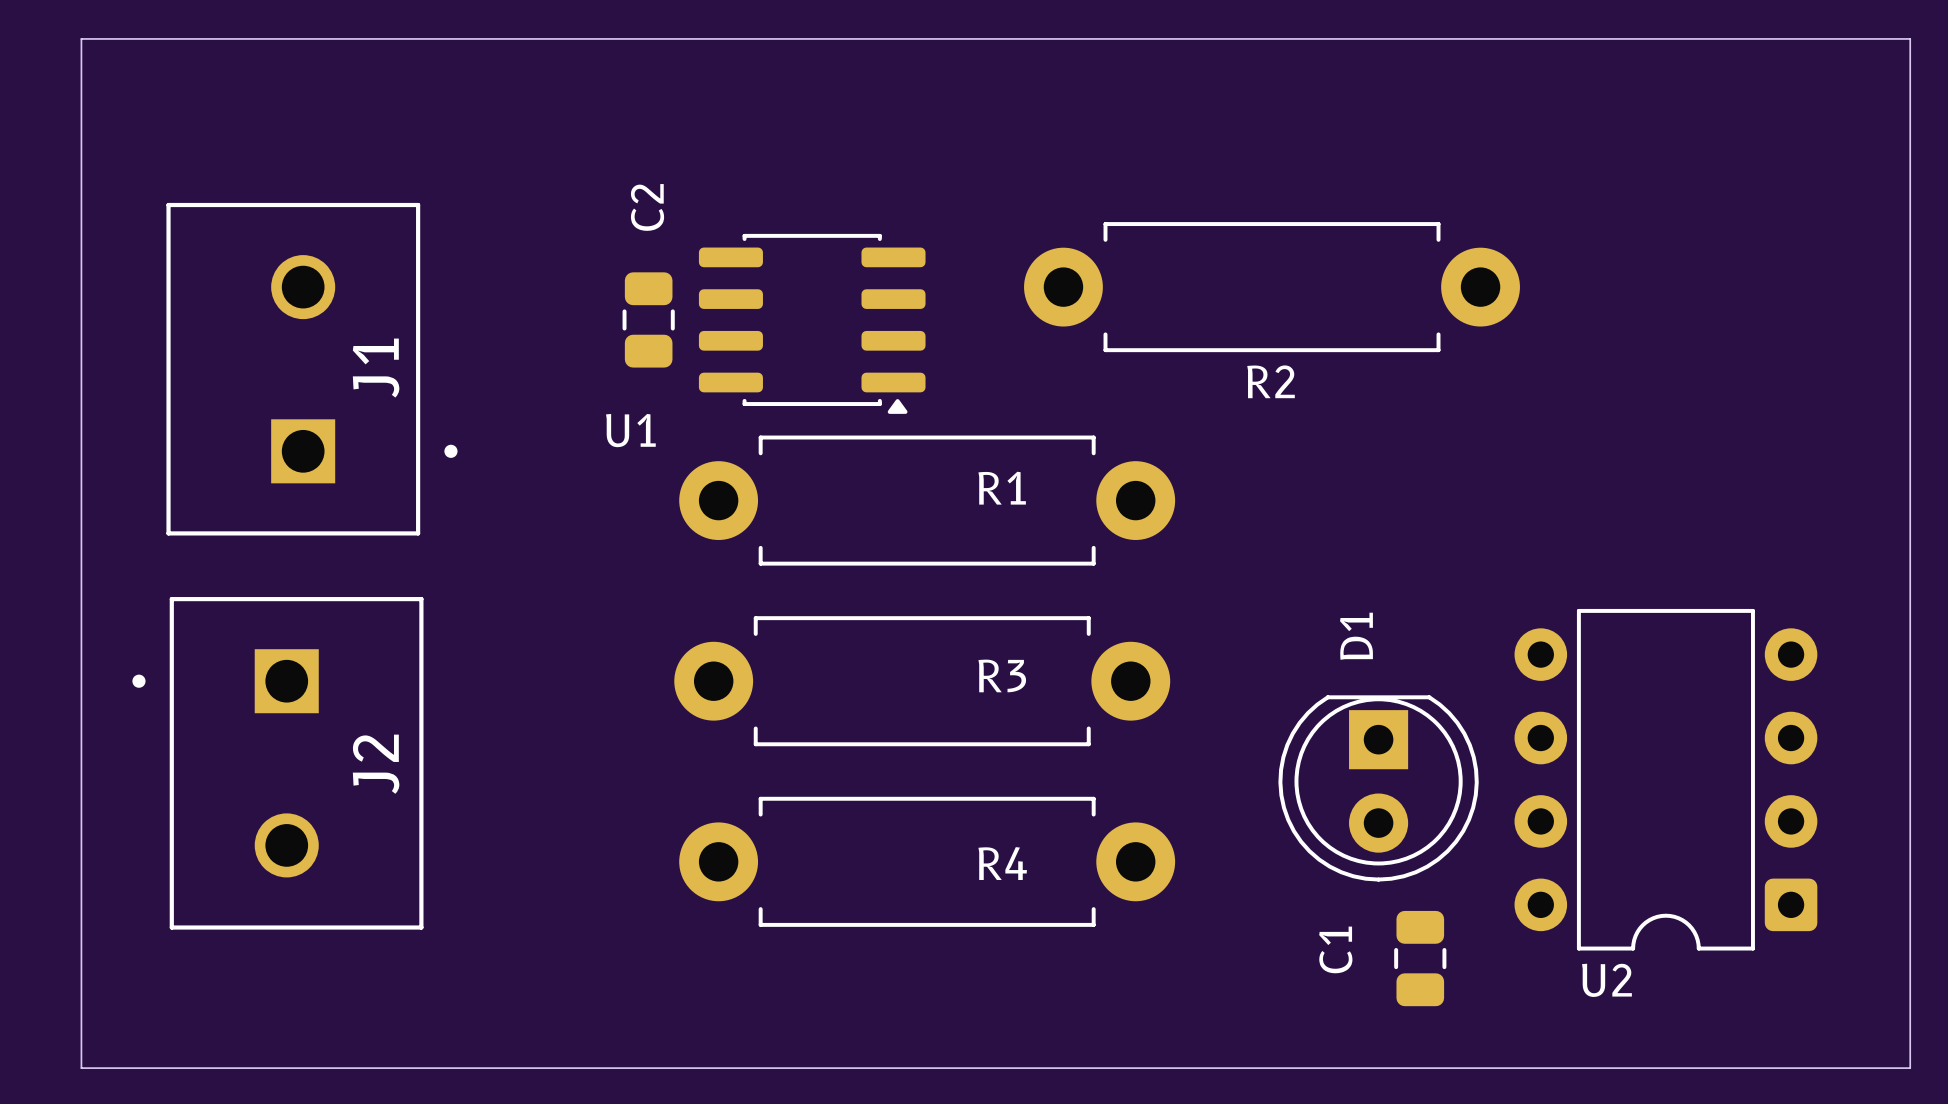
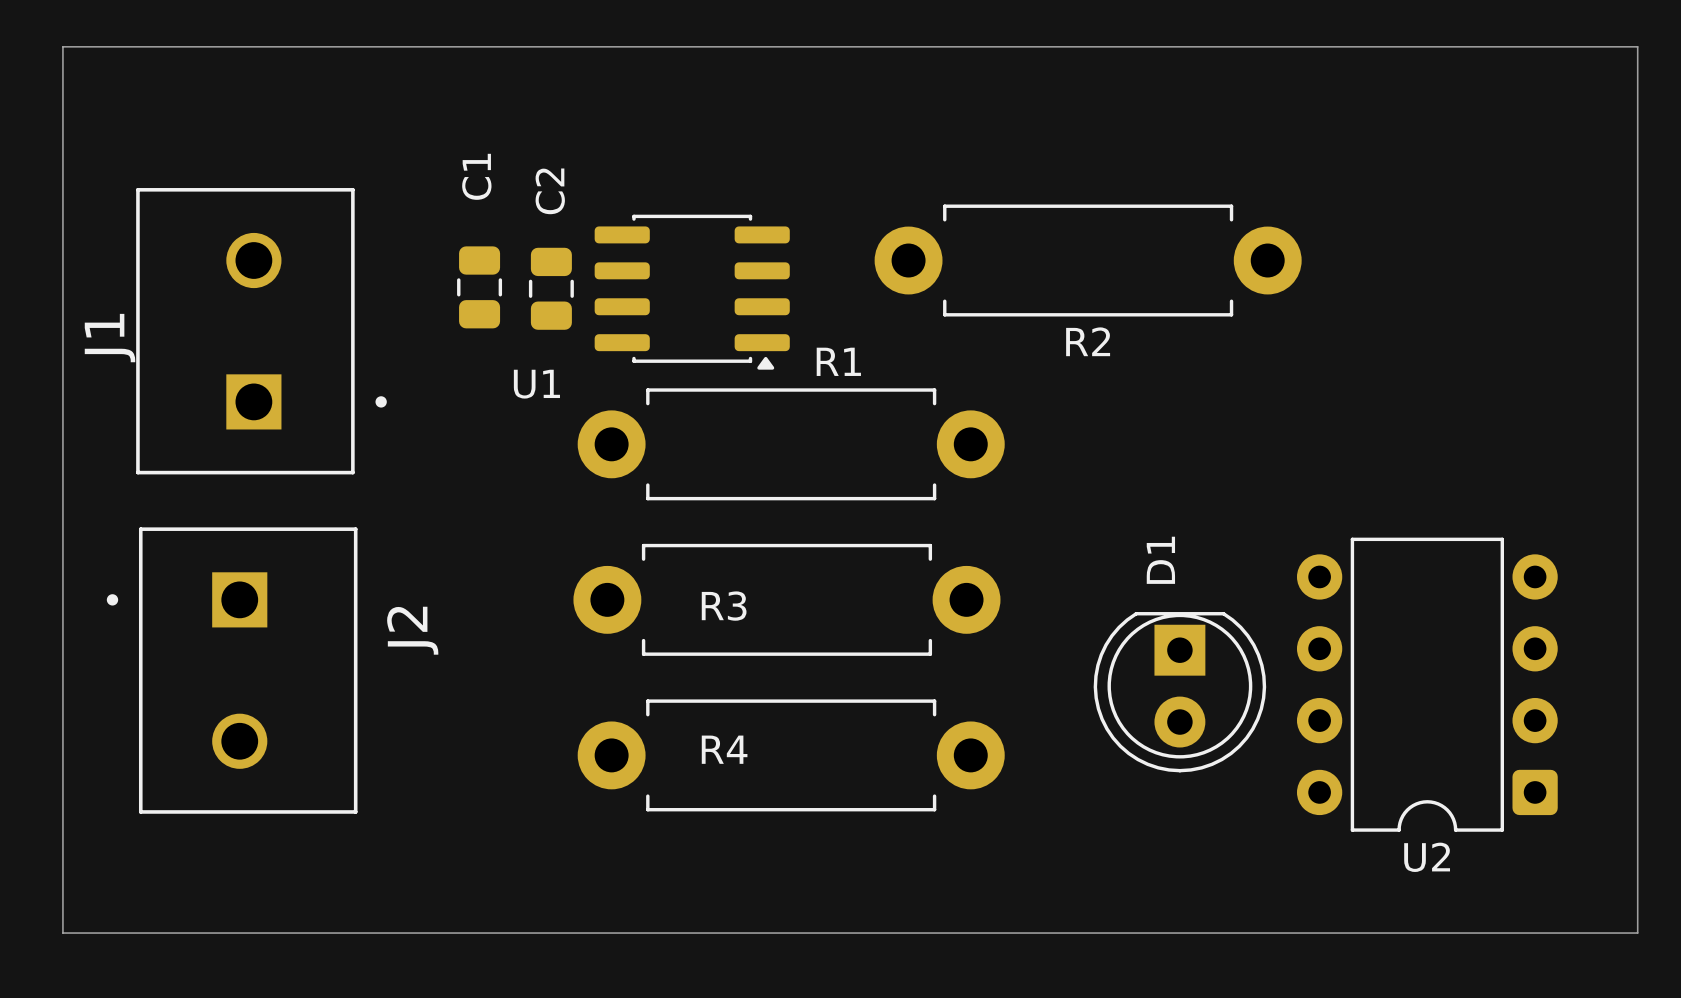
J1 name position: J1 (376, 368) -> J1 (110, 338)
R1 name position: R1 (1002, 488) -> R1 (838, 361)
R3 name position: R3 (1002, 675) -> R3 (724, 606)
J2 name position: J2 (376, 764) -> J2 (412, 630)
R4 name position: R4 (1002, 863) -> R4 (724, 749)
C1 name position: C1 (1335, 949) -> C1 (476, 176)
C1 position: (1420, 958) -> (479, 287)
U2 name position: U2 (1606, 980) -> U2 (1427, 857)

